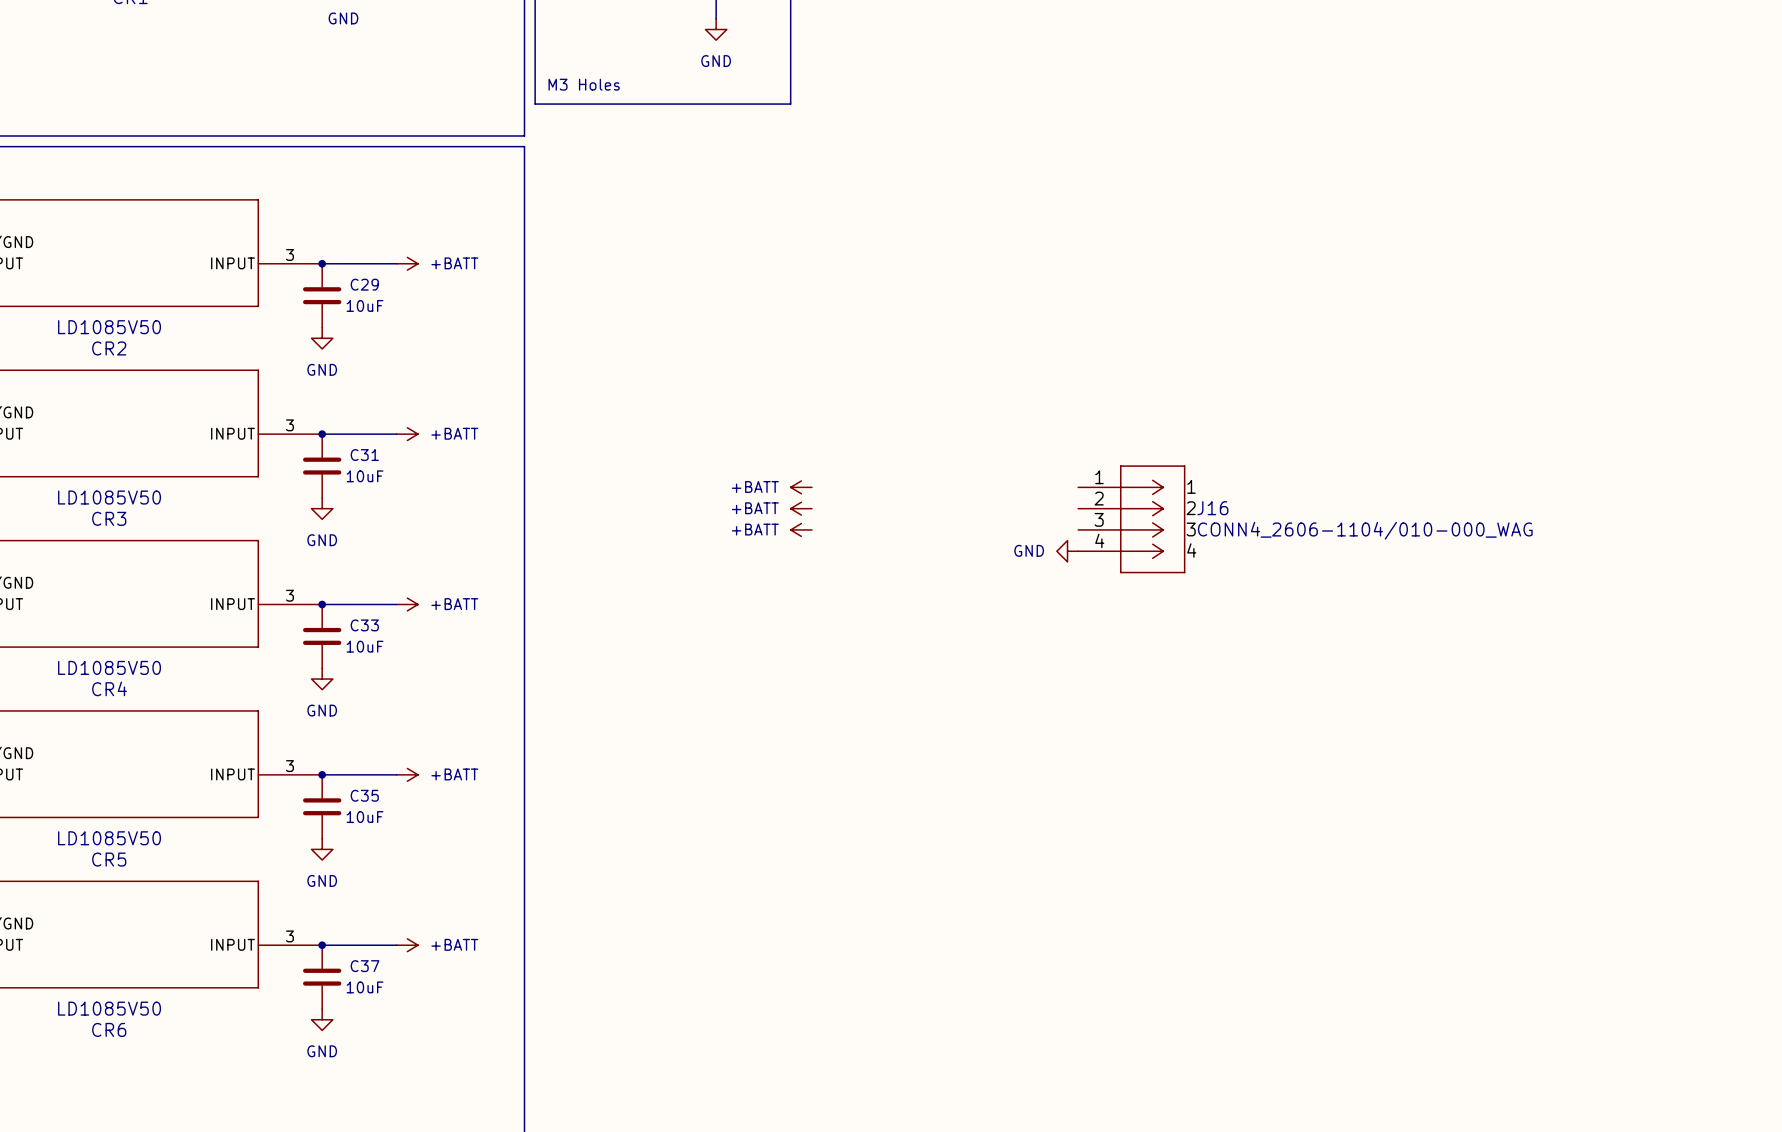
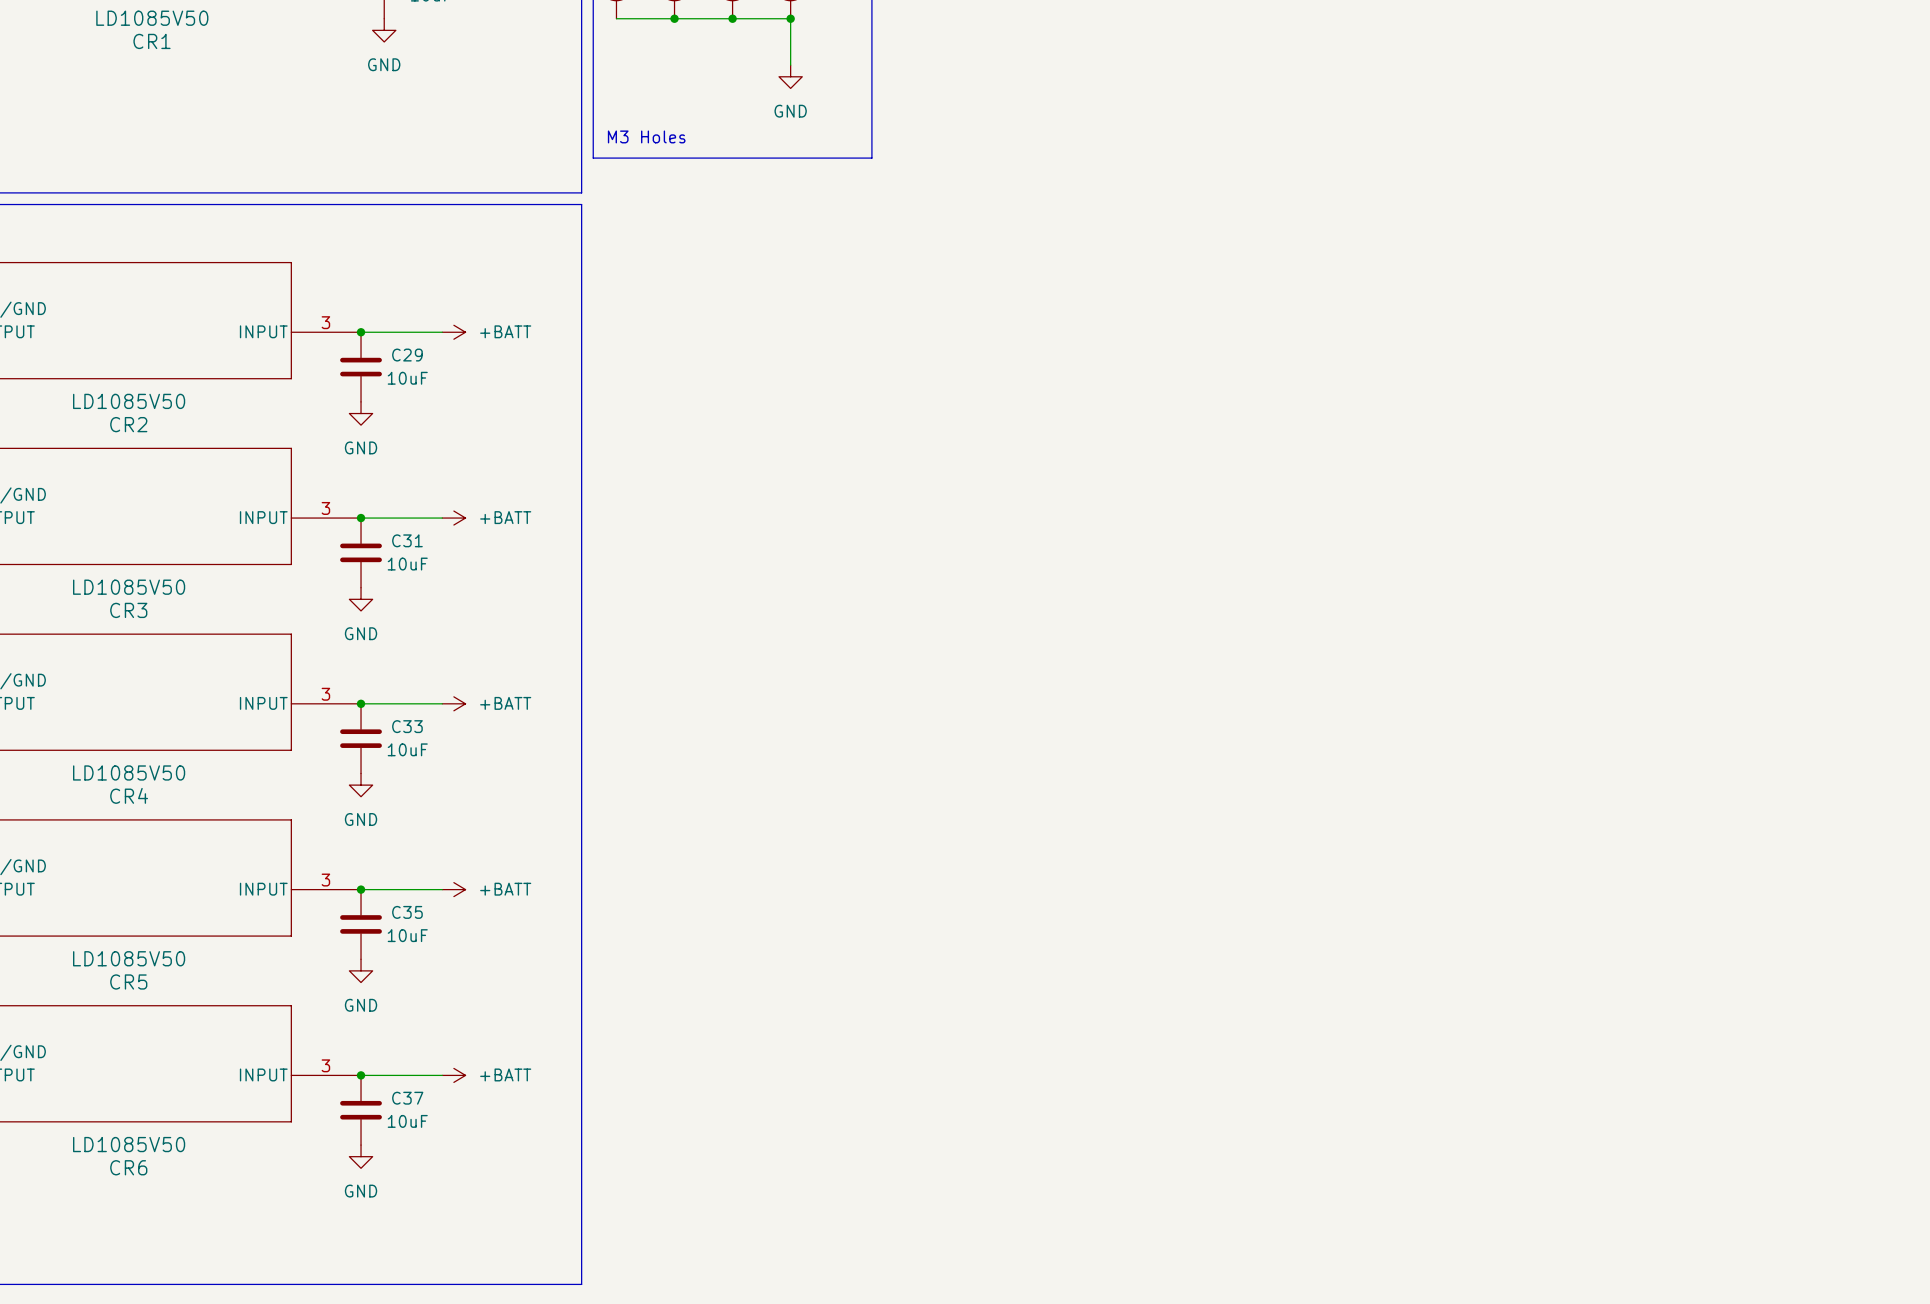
power symbol: +BATT (801, 487) -> none
power symbol: +BATT (801, 508) -> none
J16: CONN4_2606-1104/010-000_WAG (1131, 519) -> none
power symbol: +BATT (801, 529) -> none
power symbol: GND (1067, 551) -> none

